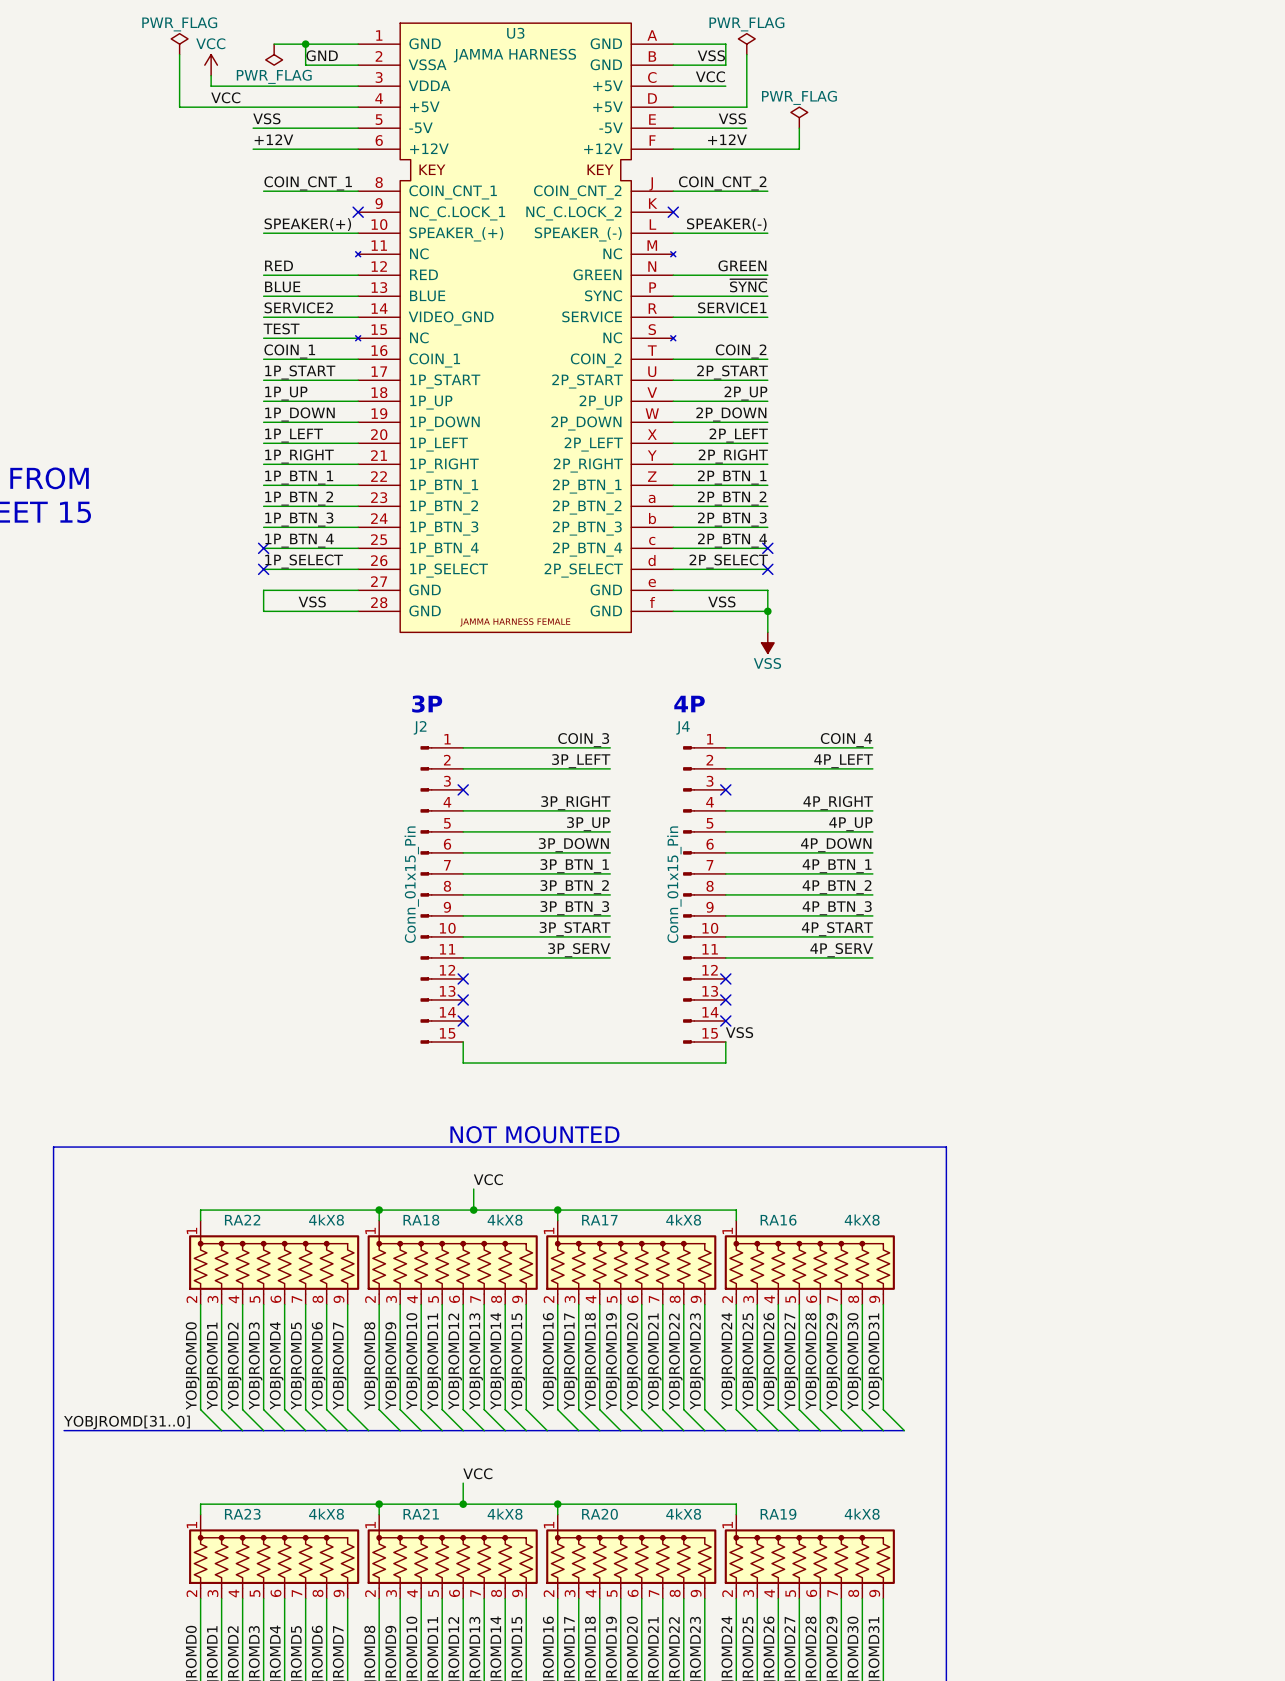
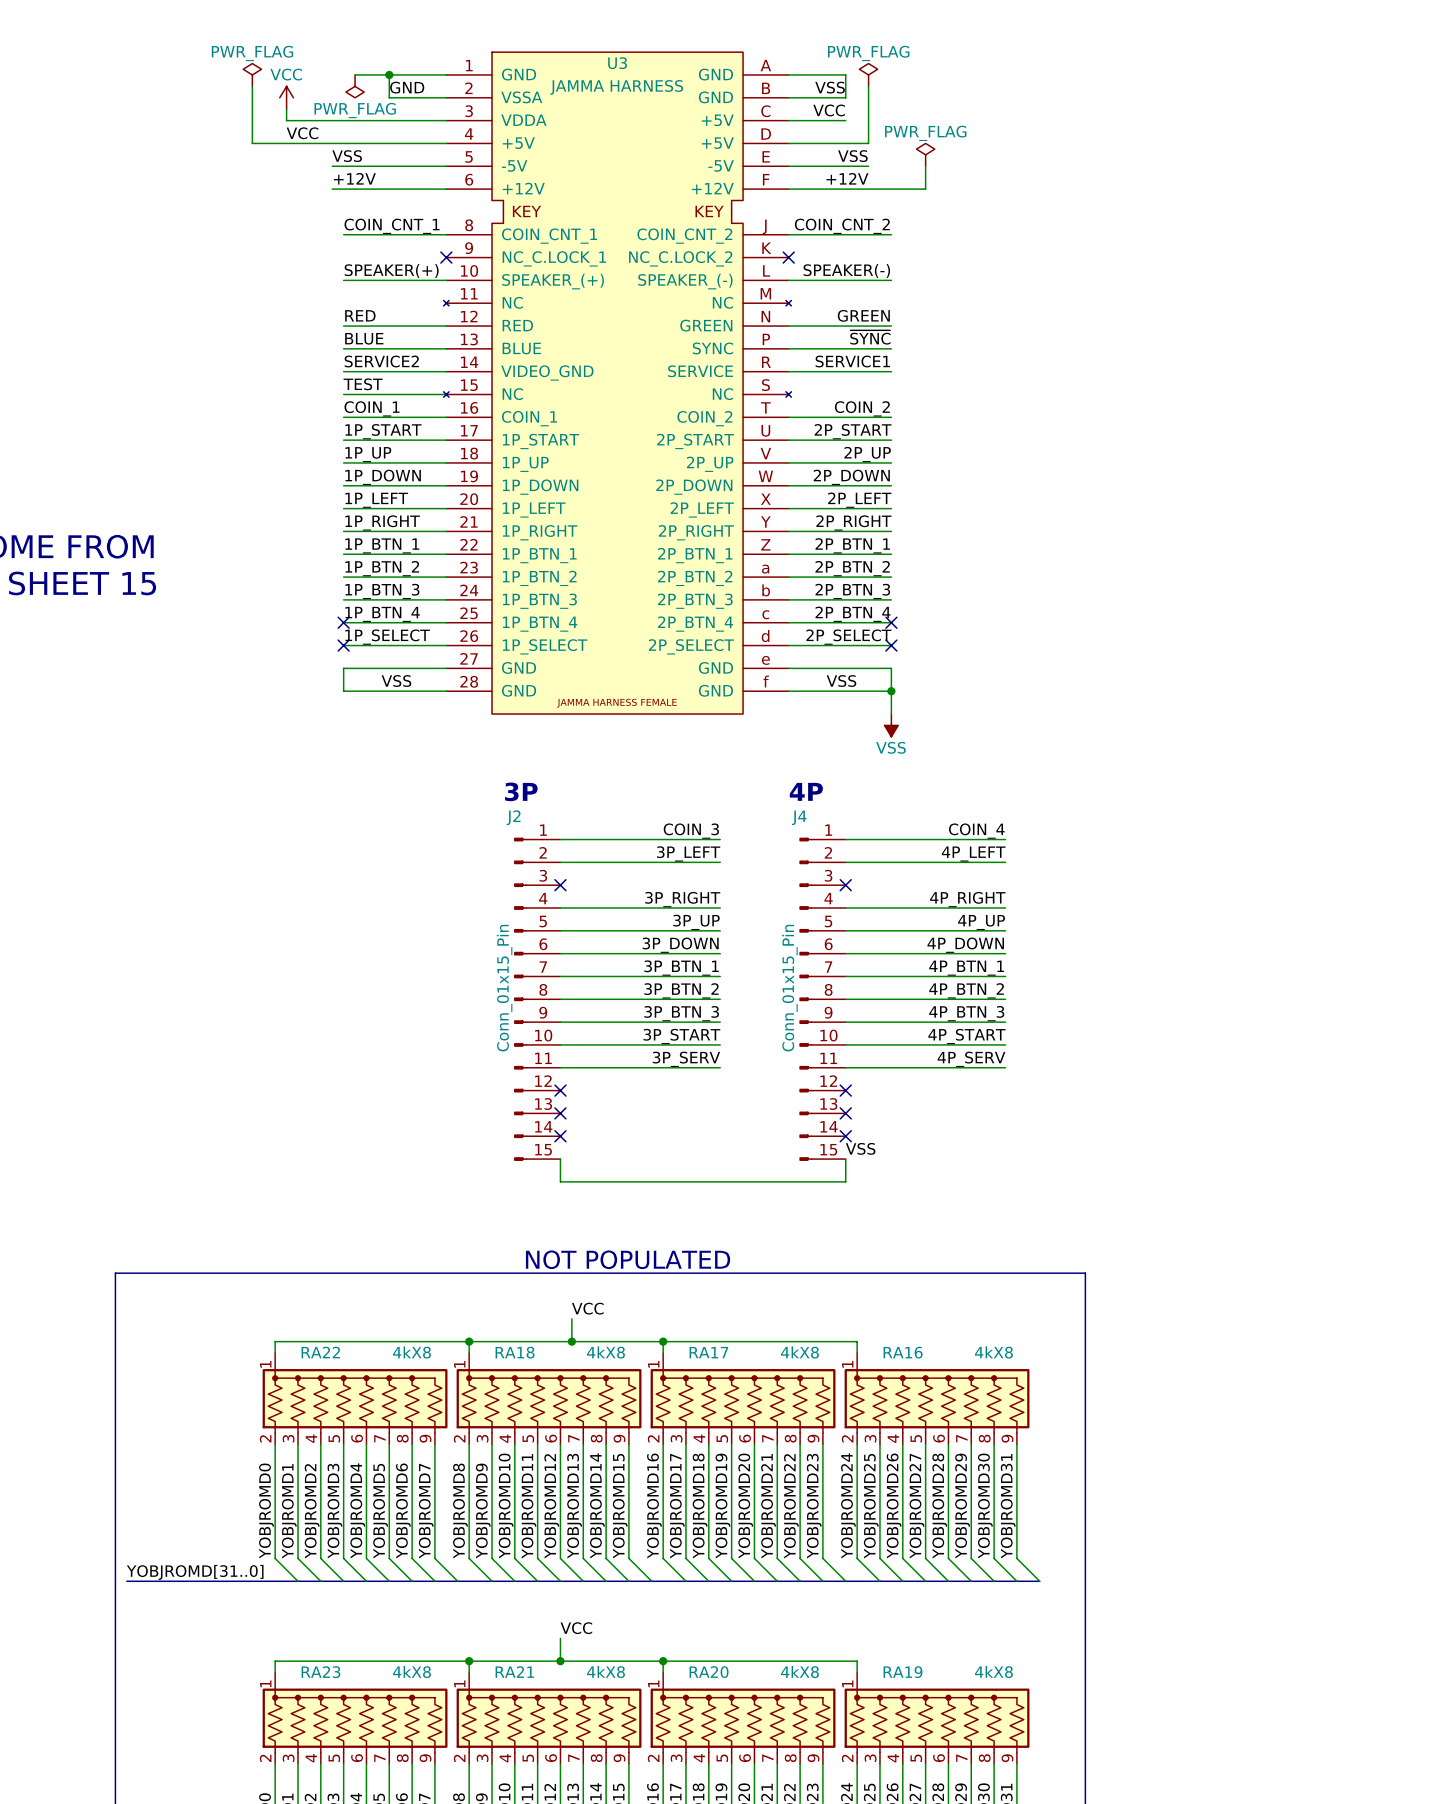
text: NOT MOUNTED (534, 1134) -> NOT POPULATED (628, 1259)

